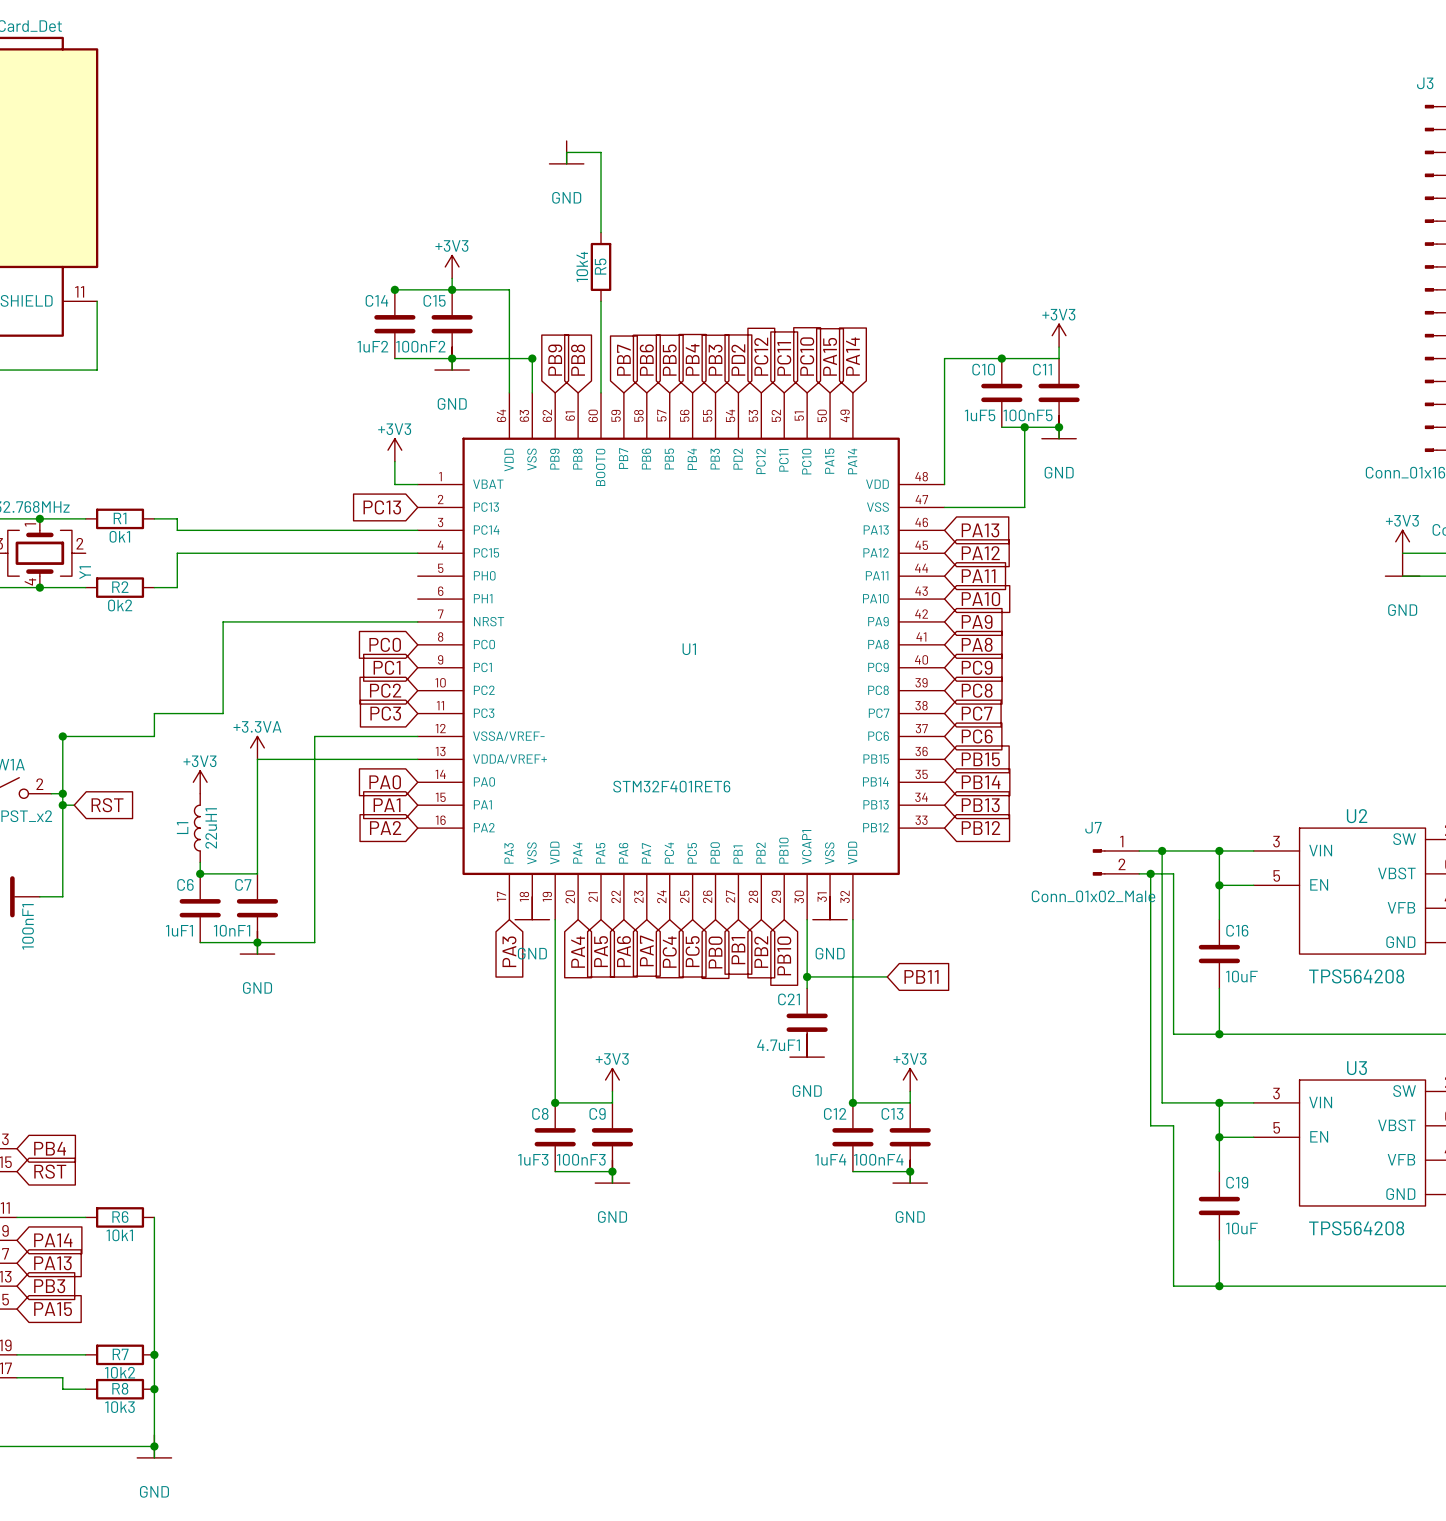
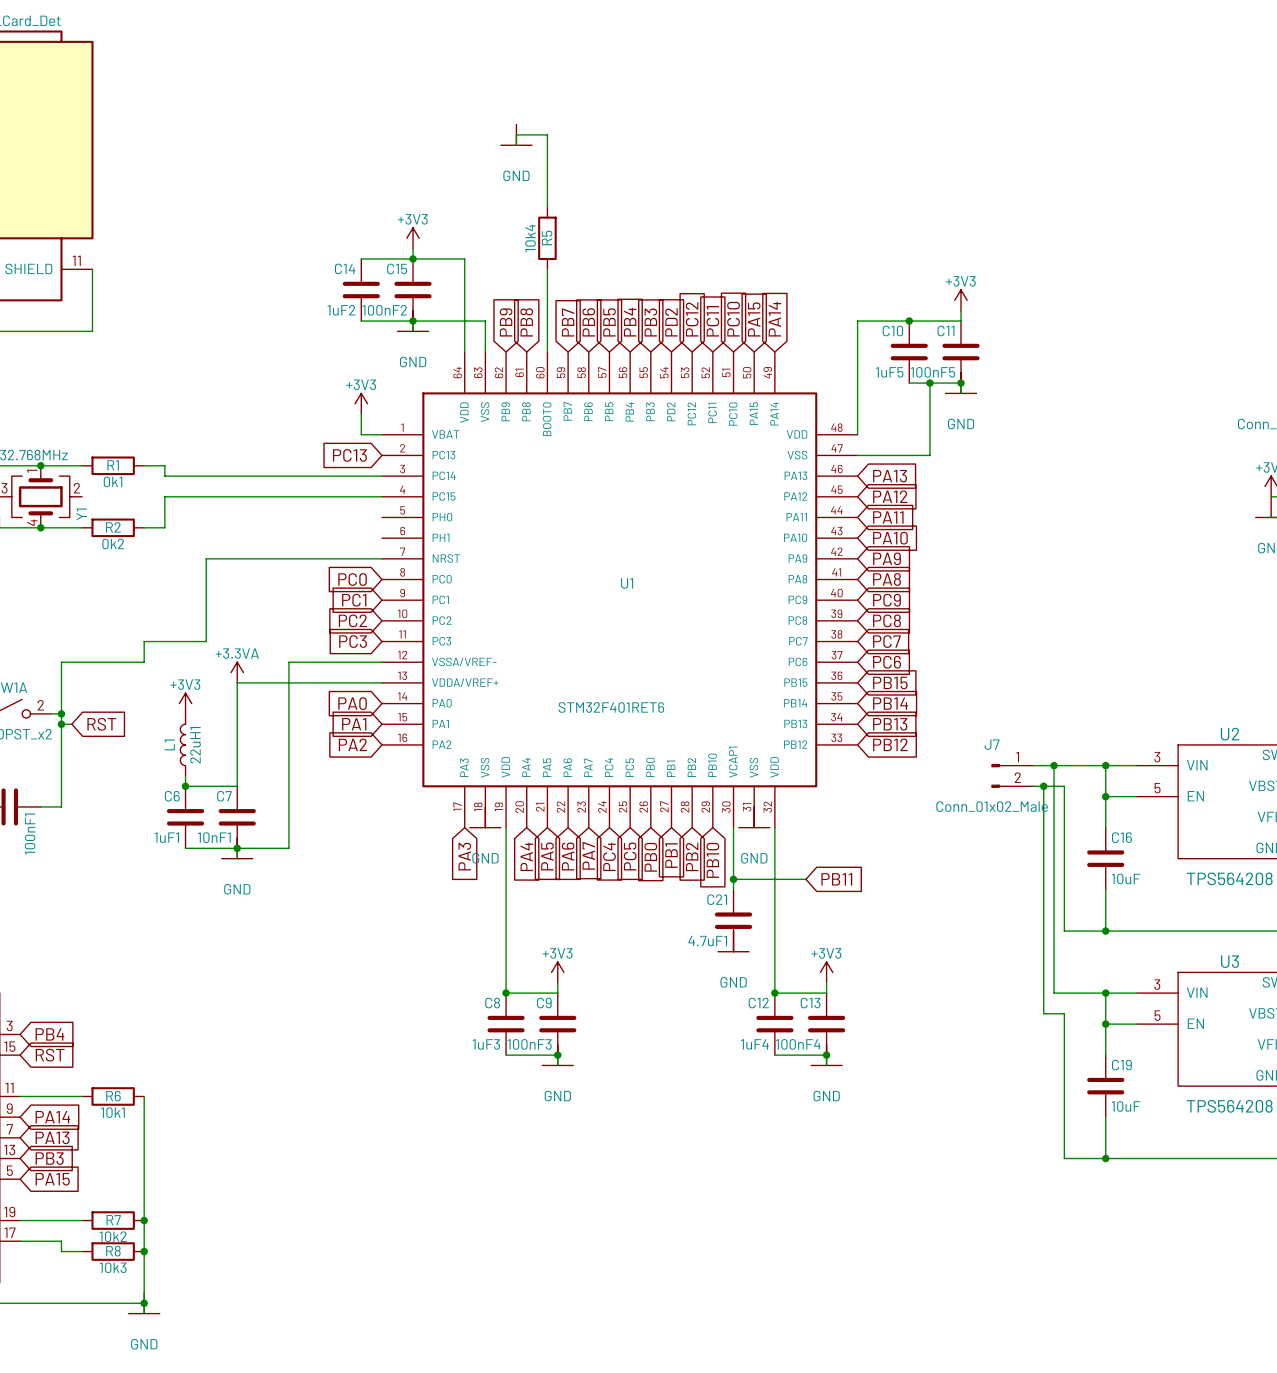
junction: (394, 289) -> none
junction: (532, 358) -> none
junction: (62, 736) -> none

